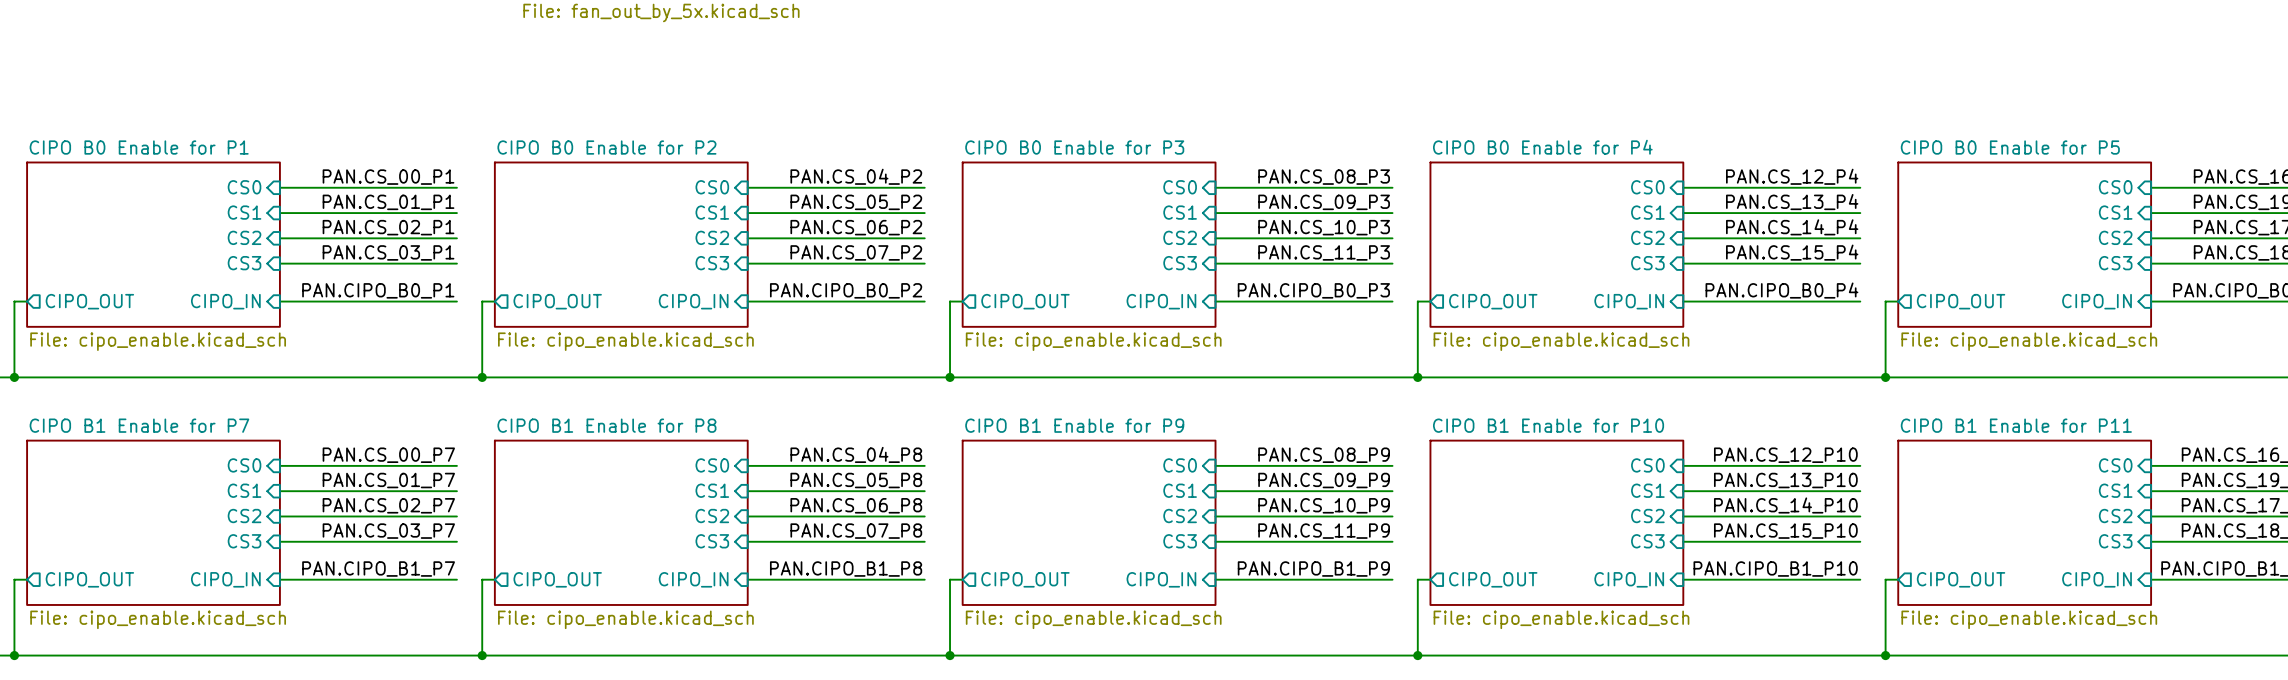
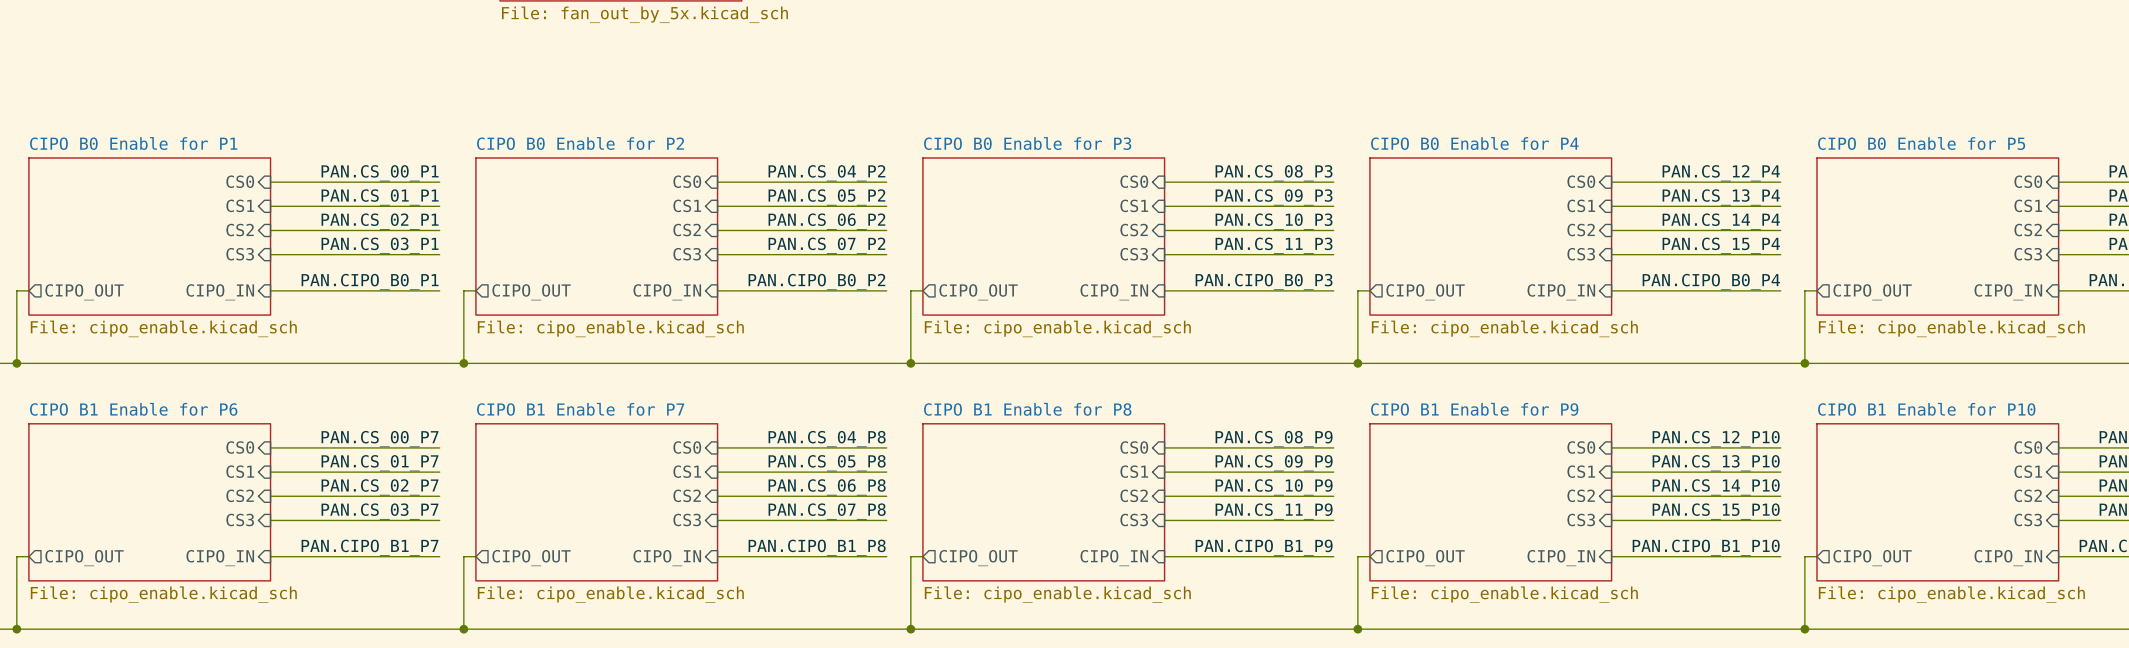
sheet CIPO B1 Enable for P7 name: CIPO B1 Enable for P7 (139, 425) -> CIPO B1 Enable for P6 (133, 409)
sheet CIPO B1 Enable for P8 name: CIPO B1 Enable for P8 (606, 425) -> CIPO B1 Enable for P7 (580, 409)
sheet CIPO B1 Enable for P9 name: CIPO B1 Enable for P9 (1074, 425) -> CIPO B1 Enable for P8 (1027, 409)
sheet CIPO B1 Enable for P10 name: CIPO B1 Enable for P10 (1548, 425) -> CIPO B1 Enable for P9 (1474, 409)
sheet CIPO B1 Enable for P11 name: CIPO B1 Enable for P11 (2016, 425) -> CIPO B1 Enable for P10 (1926, 409)

